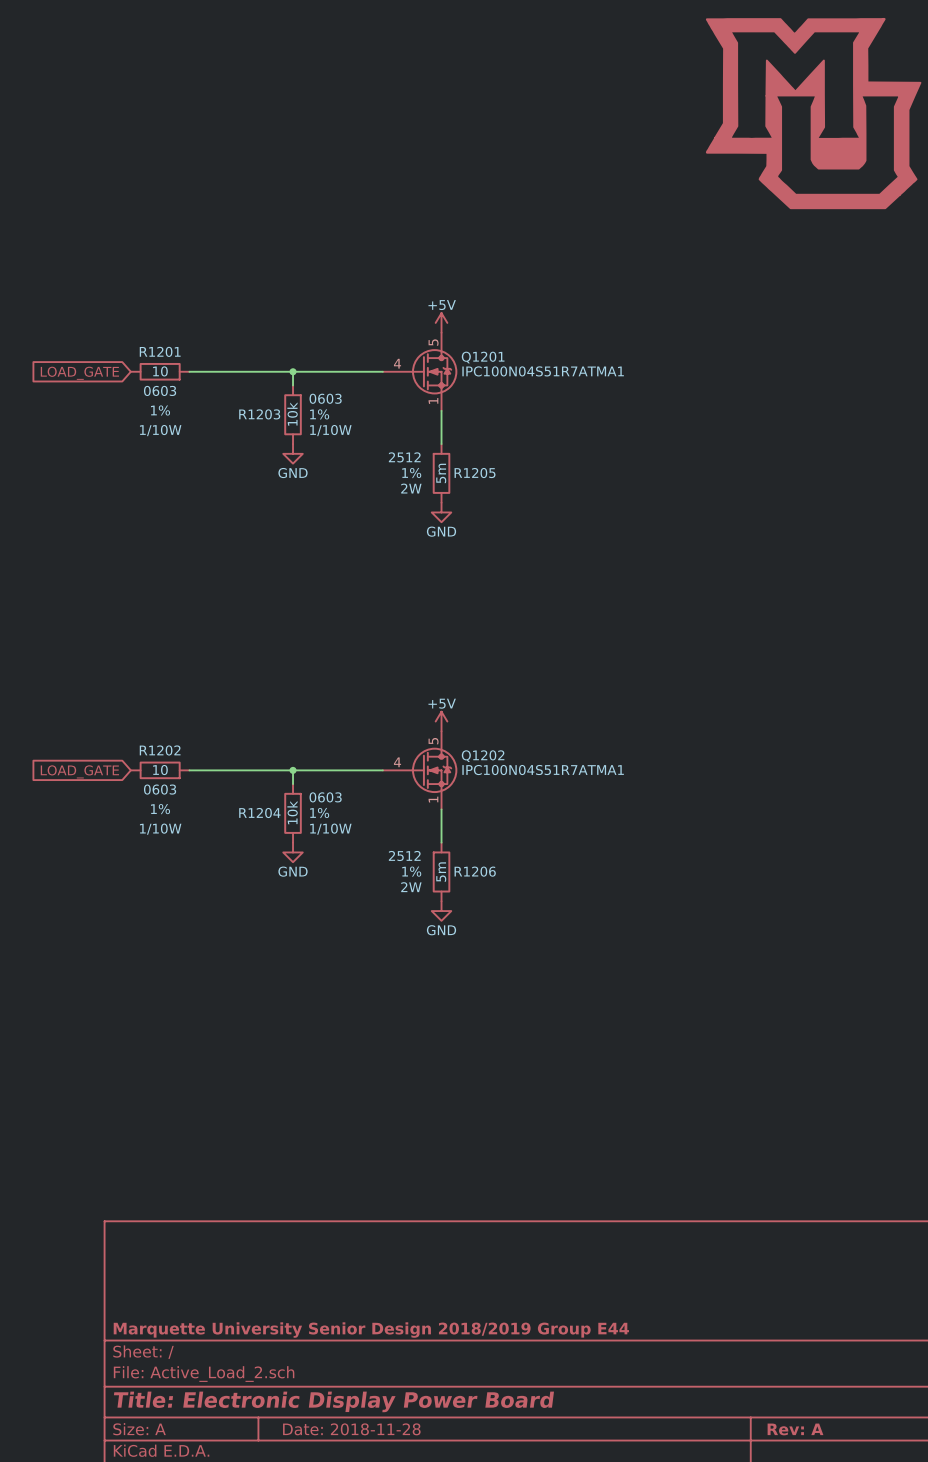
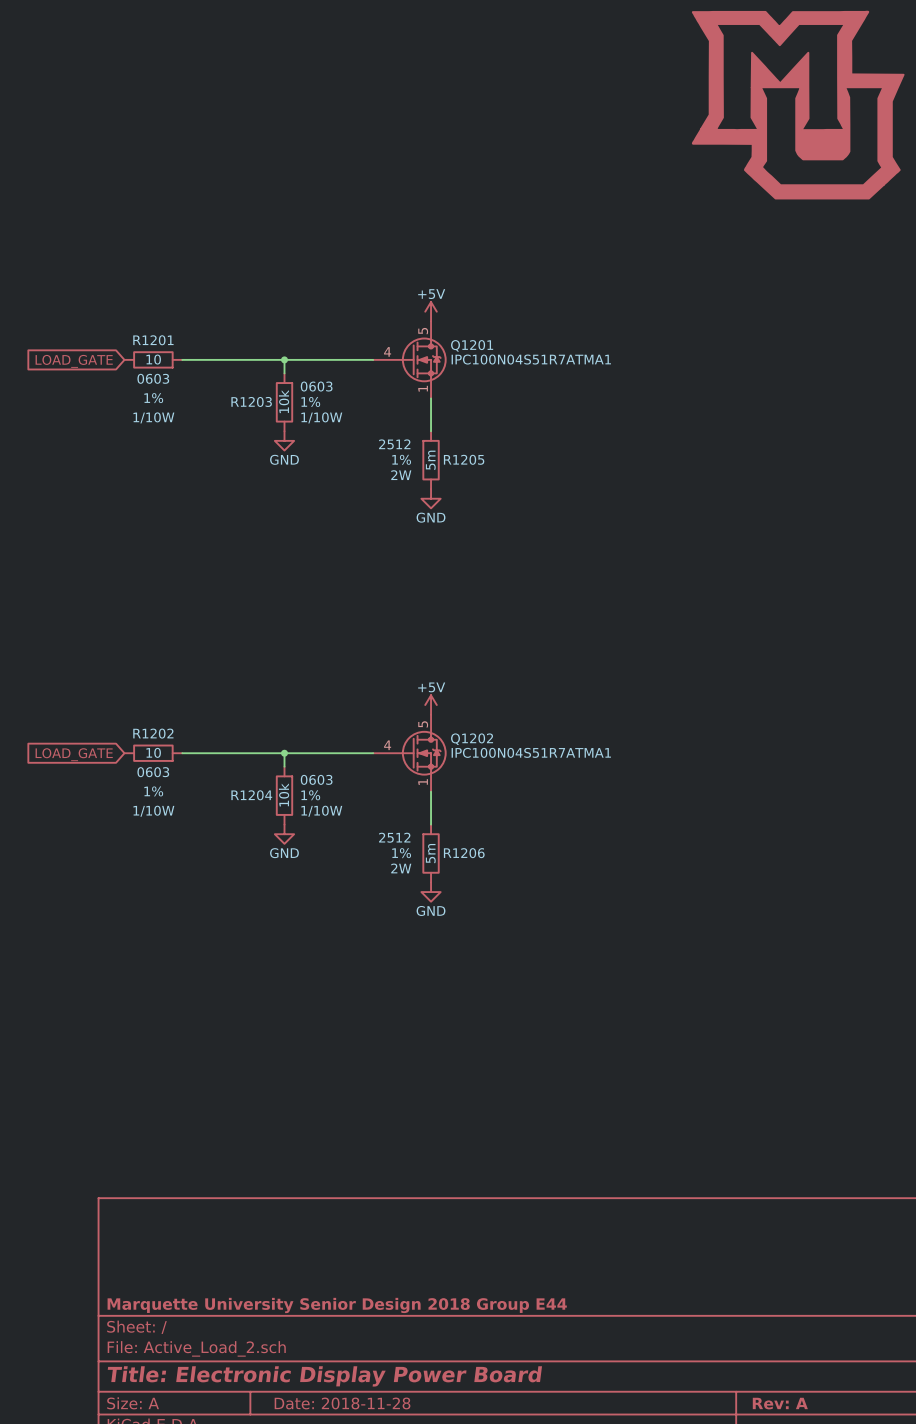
title block: Marquette University Senior Design 2018/2019 Group E44 (371, 1330) -> Marquette University Senior Design 2018 Group E44 (337, 1305)

